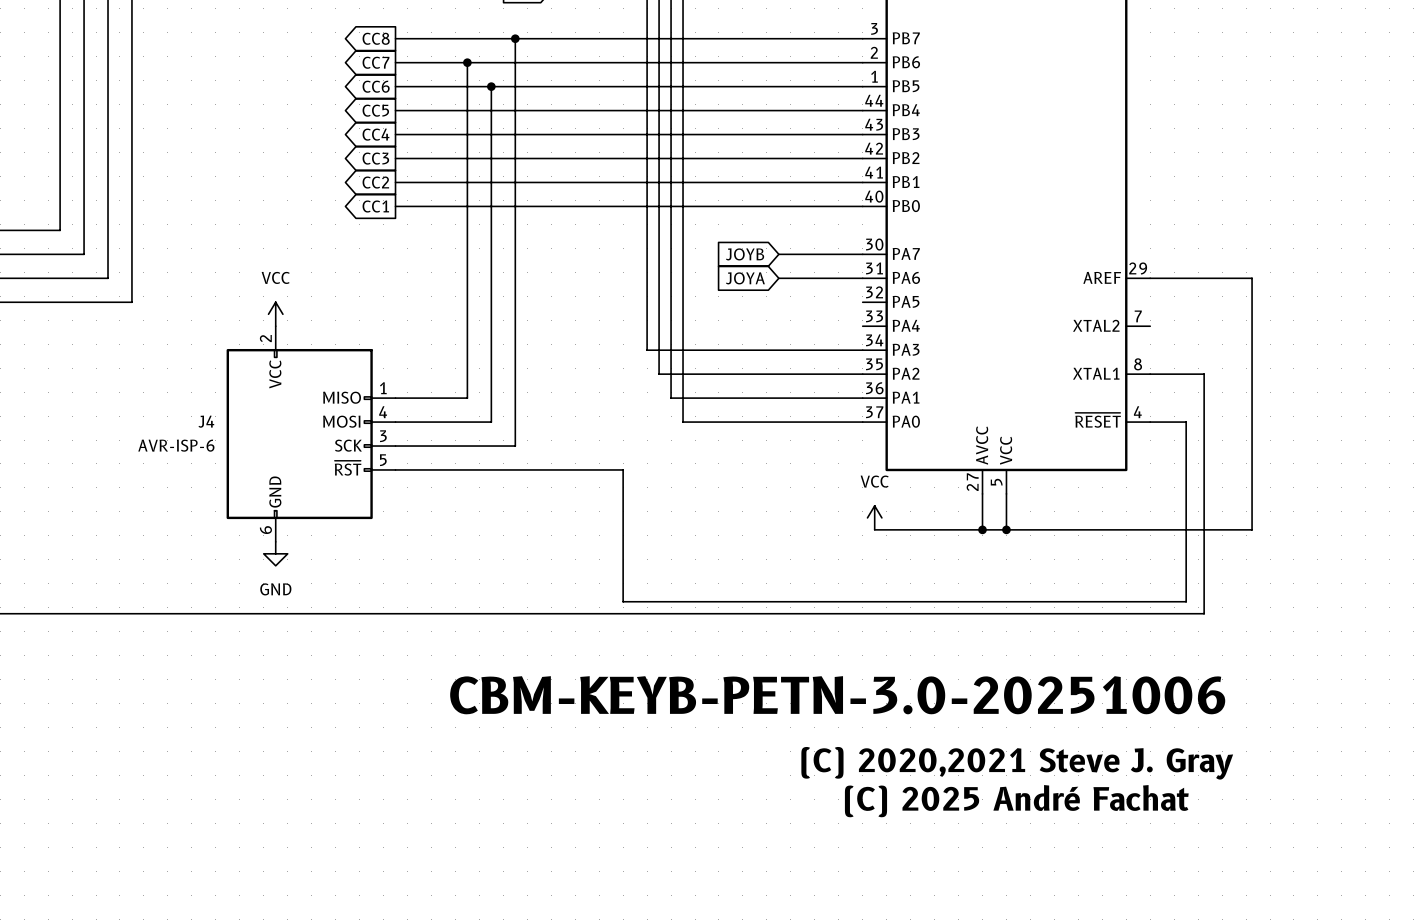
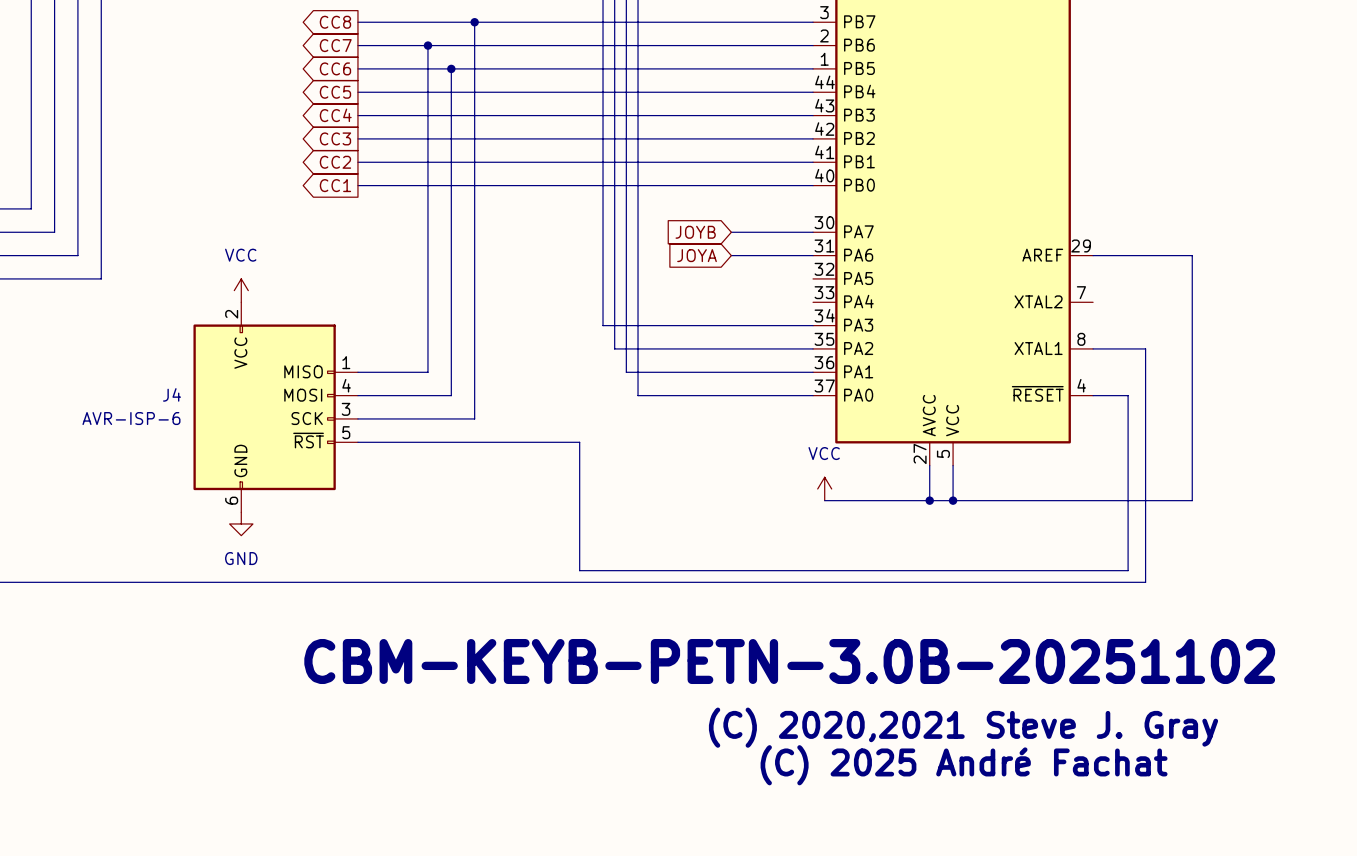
text: CBM-KEYB-PETN-3.0-20251006 (837, 695) -> CBM-KEYB-PETN-3.0B-20251102 (789, 661)

